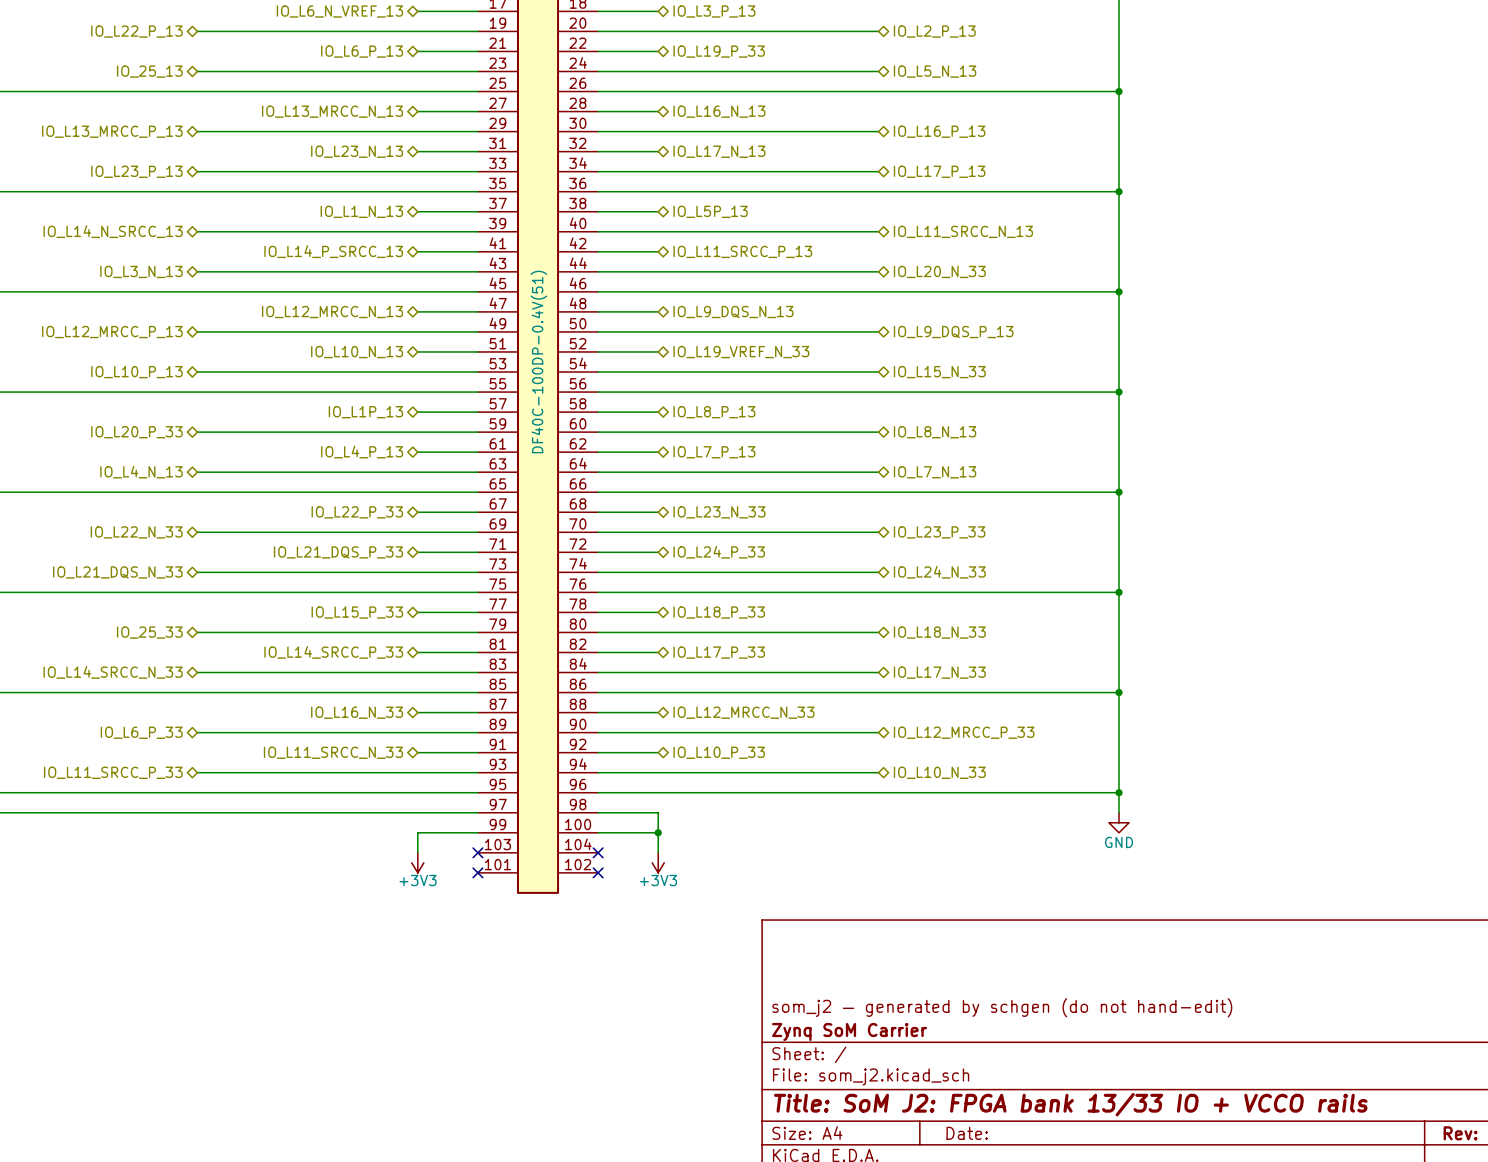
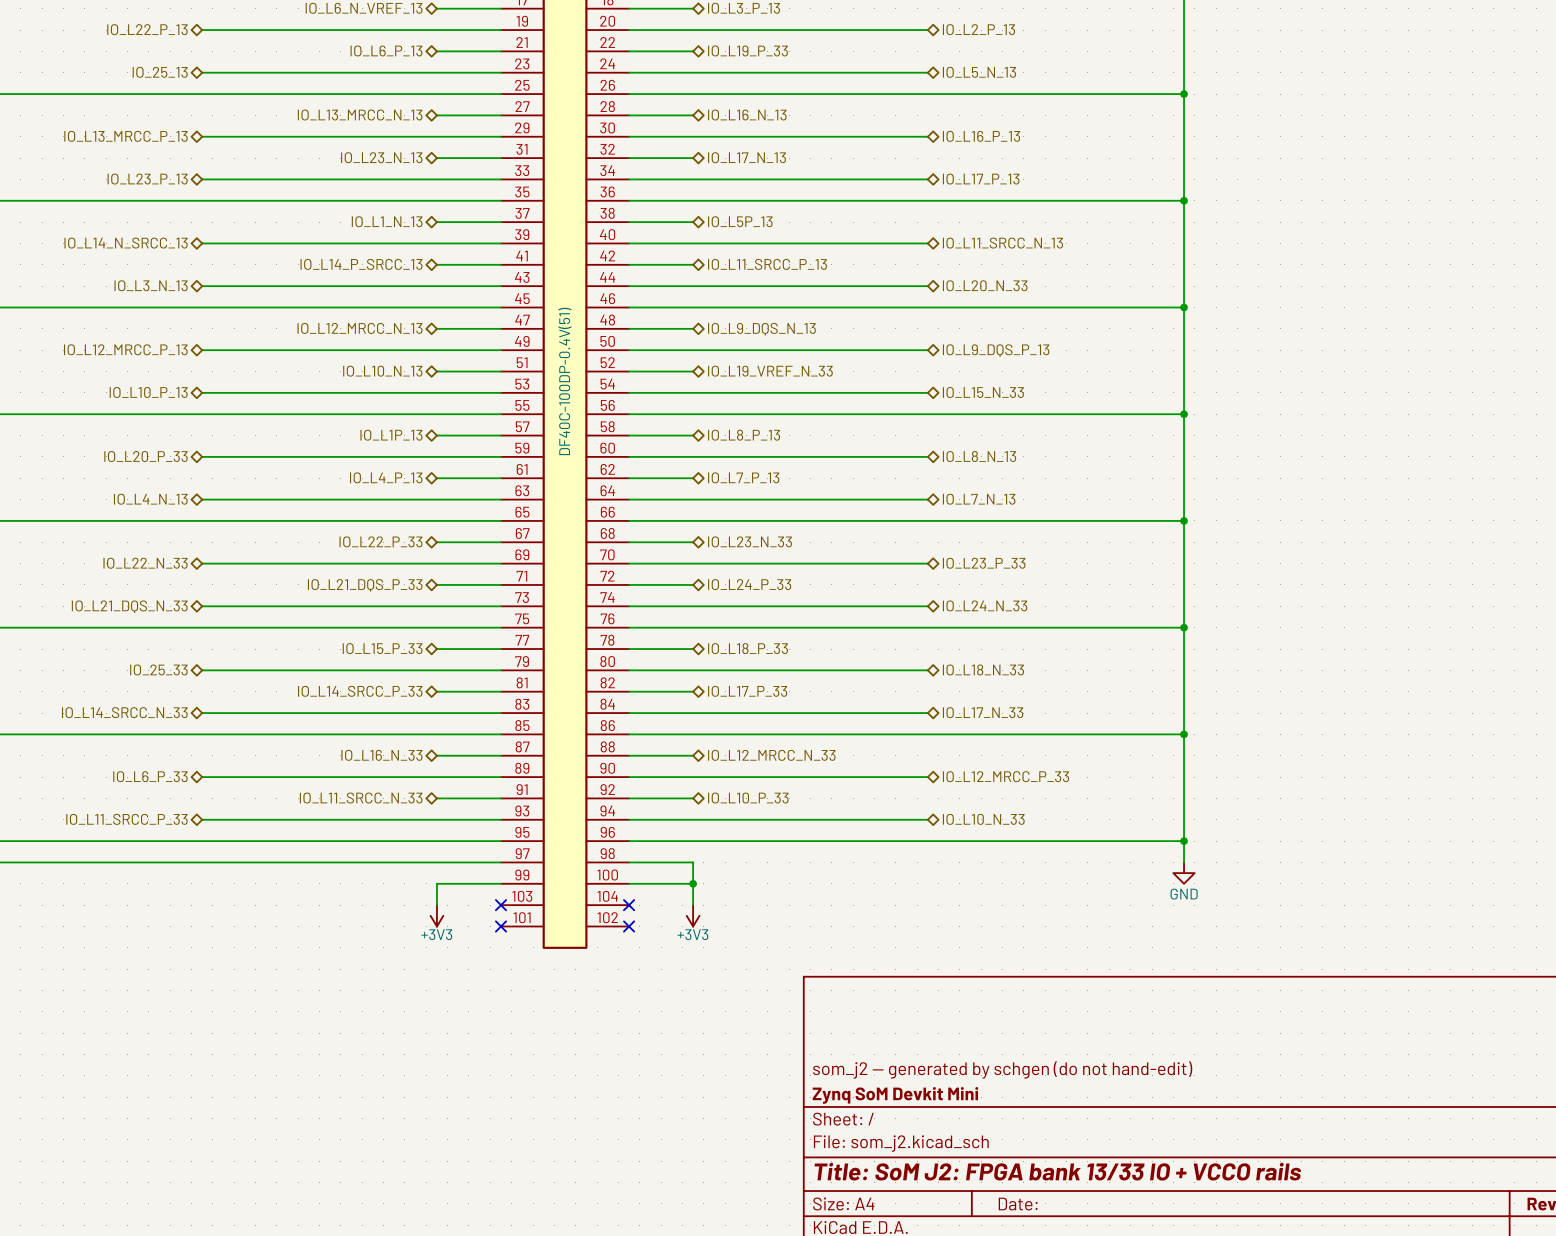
title block: Zynq SoM Carrier (849, 1031) -> Zynq SoM Devkit Mini (895, 1095)

